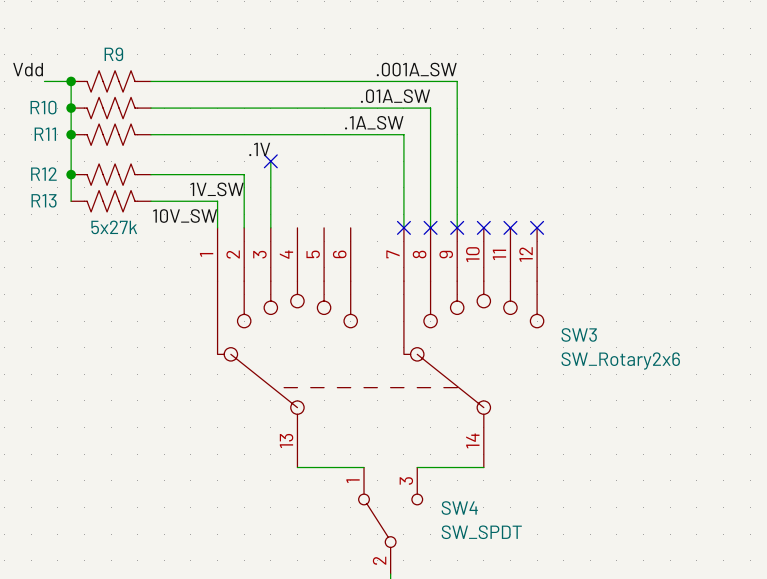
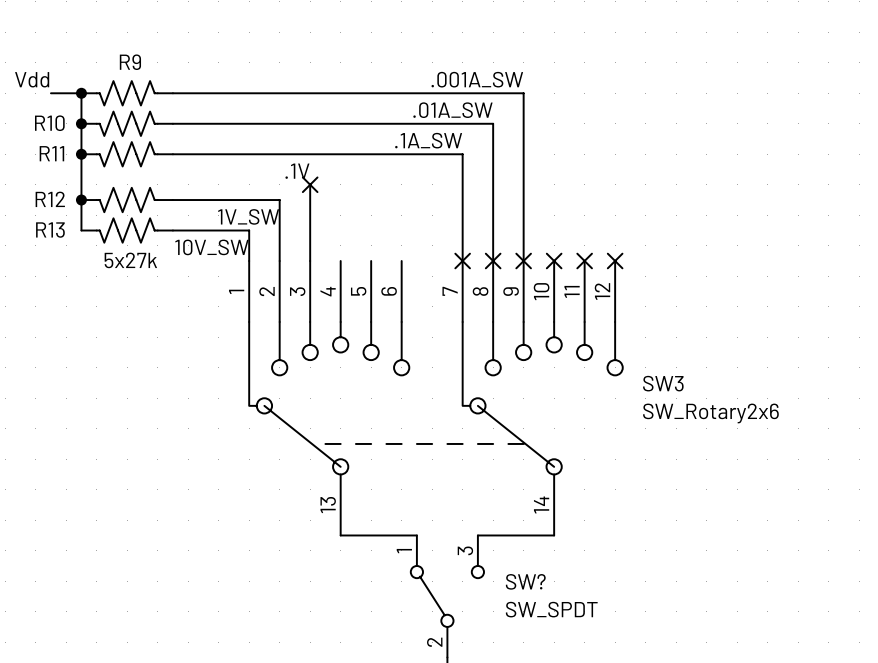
SW4 name: SW4 (459, 508) -> SW? (525, 581)

